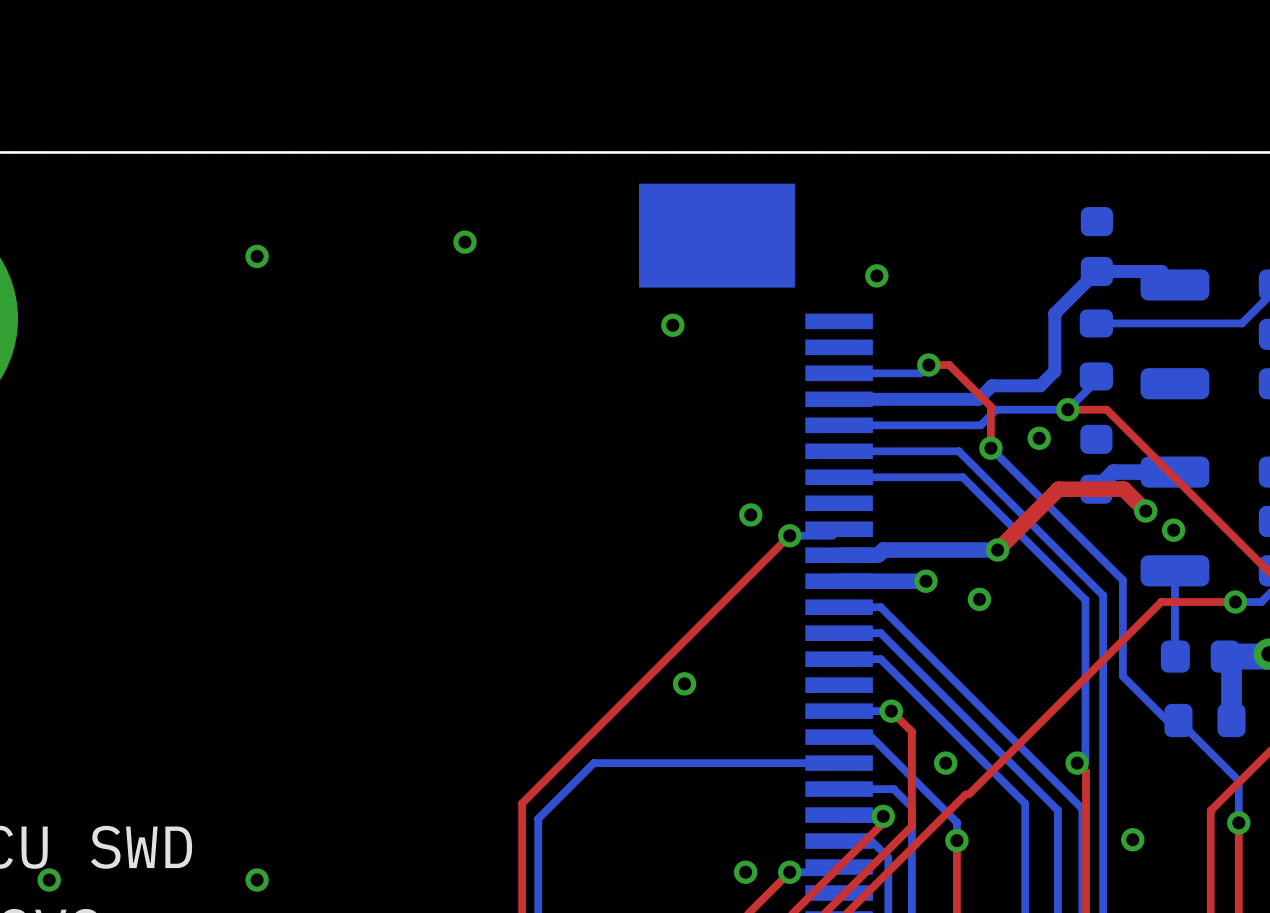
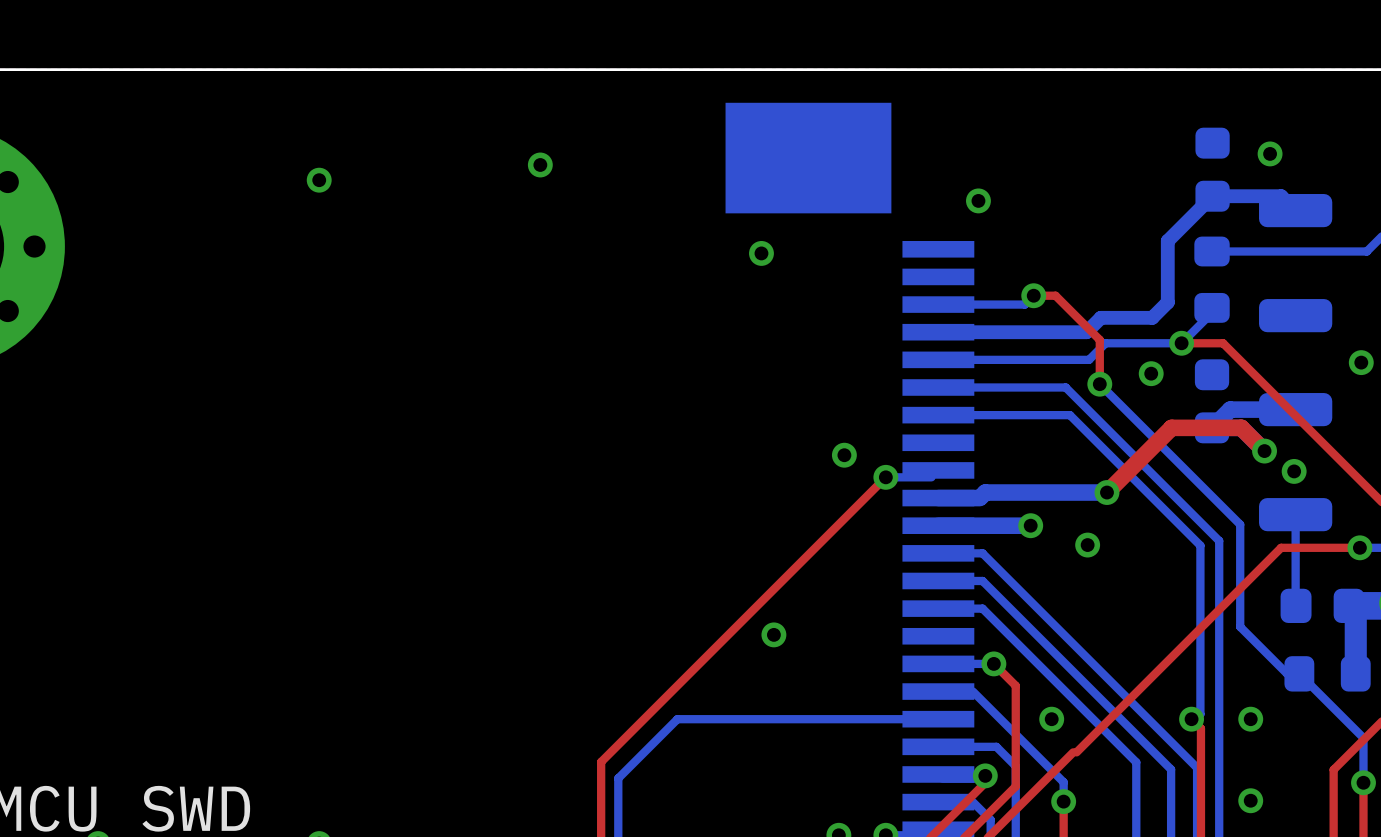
via: none -> (1270, 153)
via: none -> (1361, 362)
via: none -> (1250, 719)

